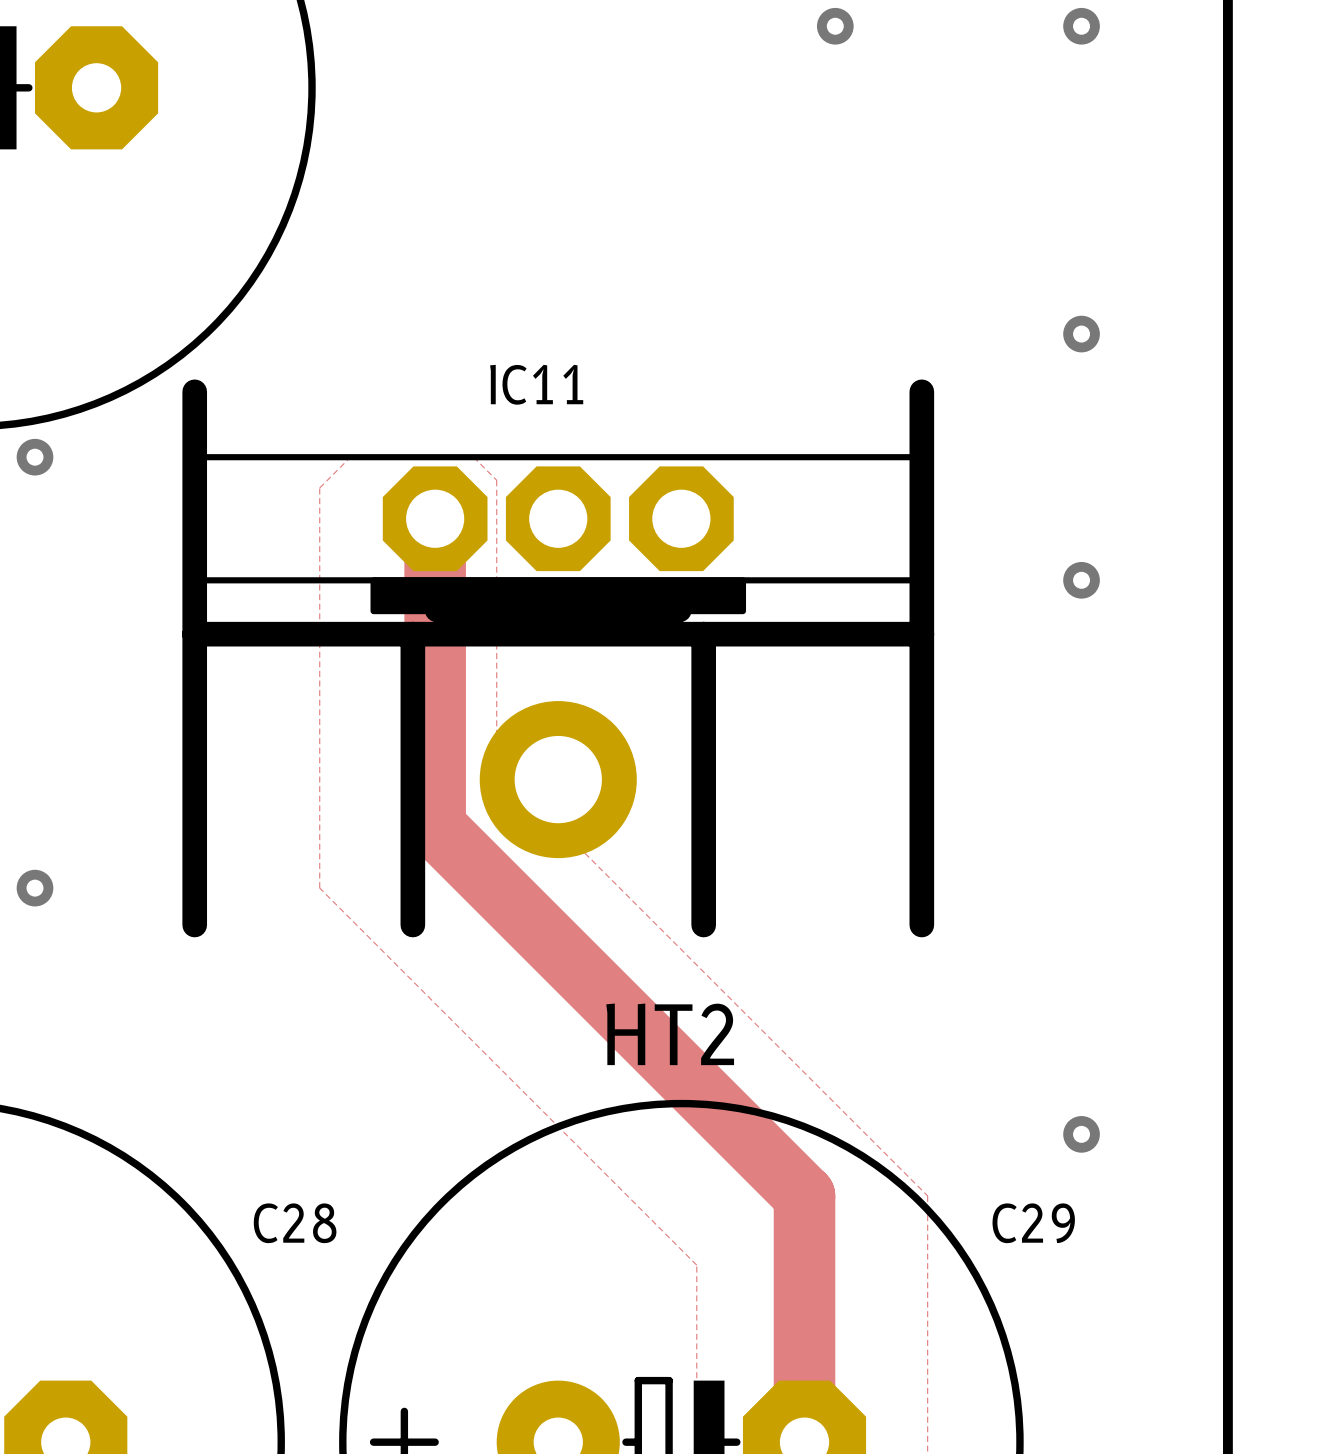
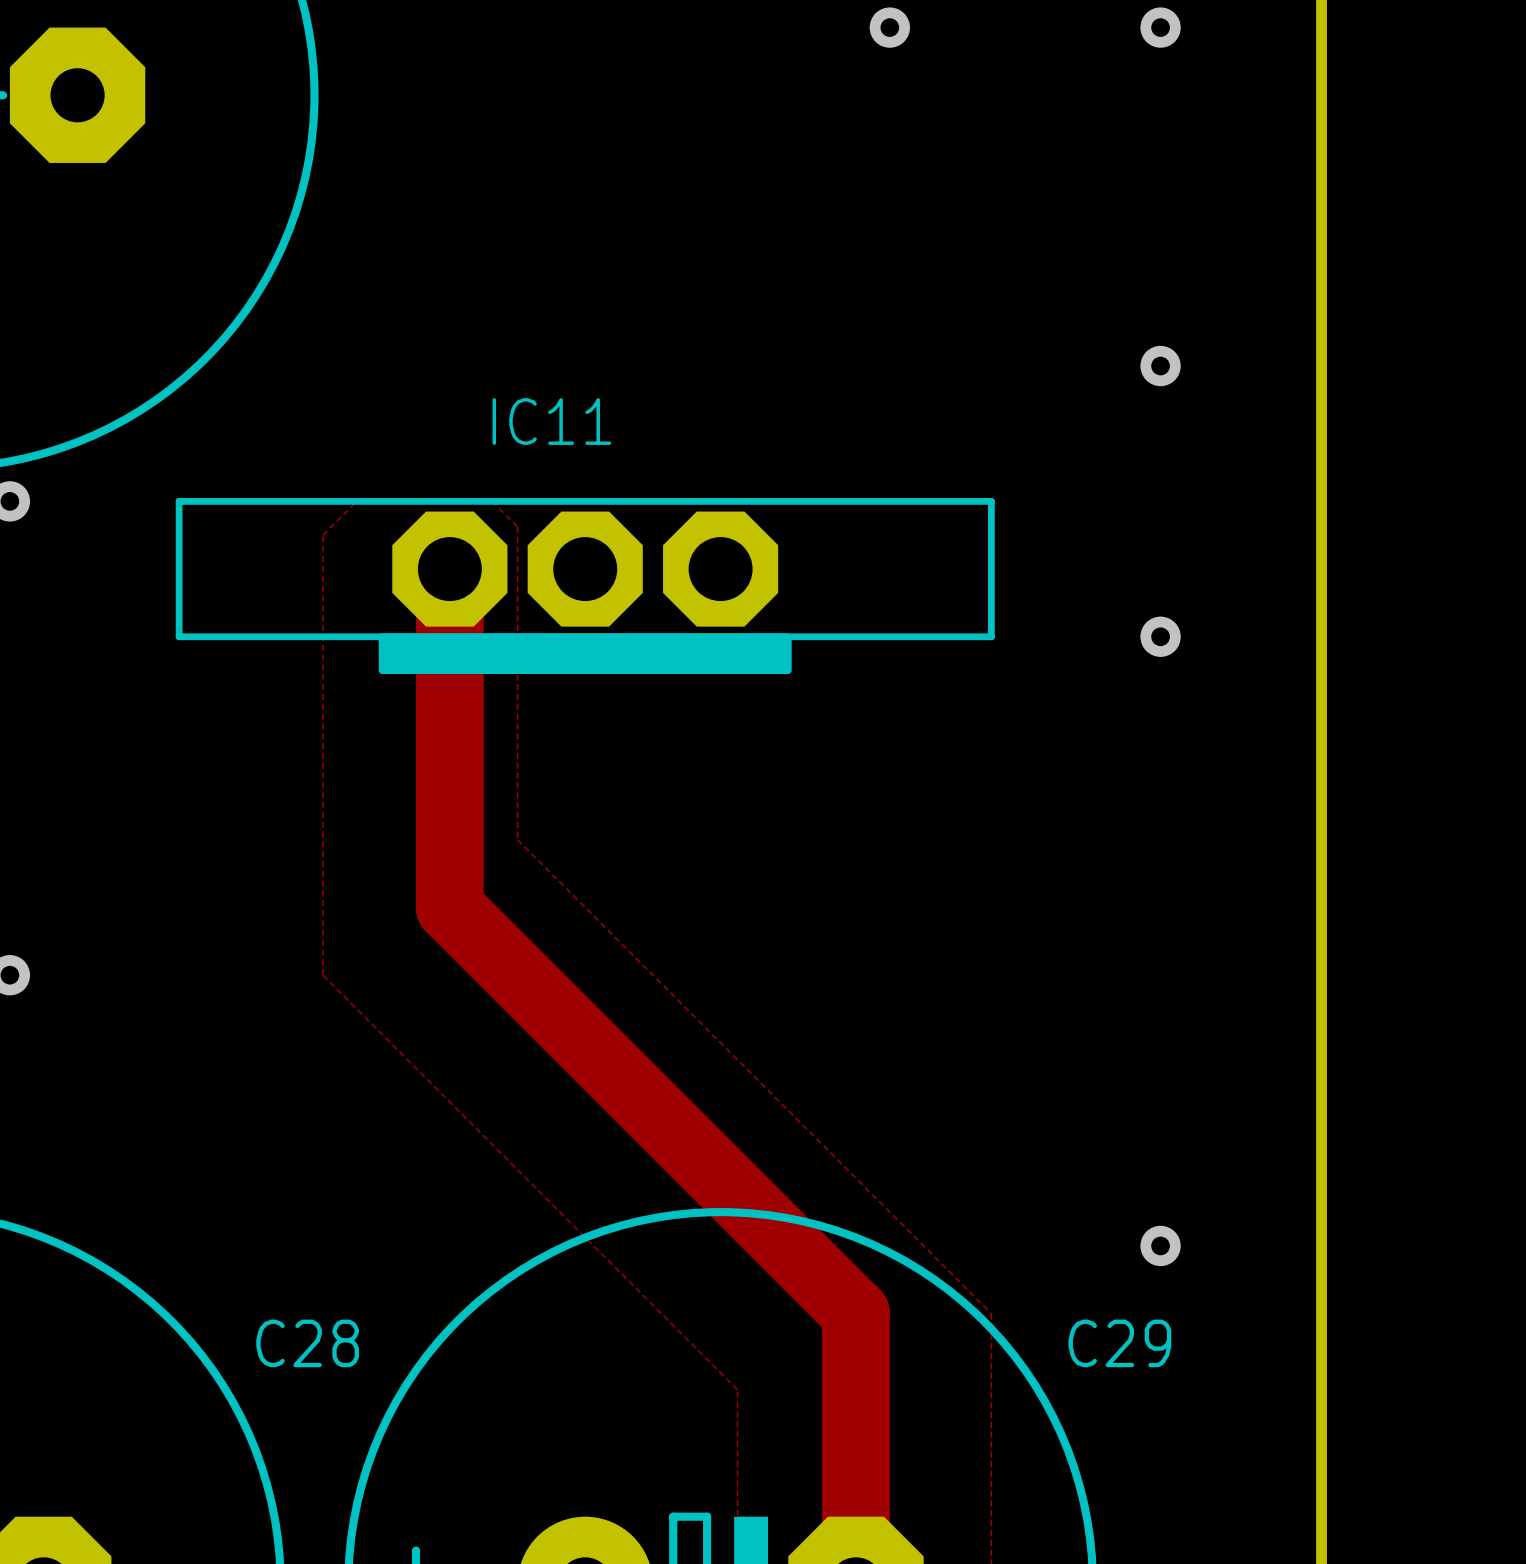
HT2: (558, 658) -> none

